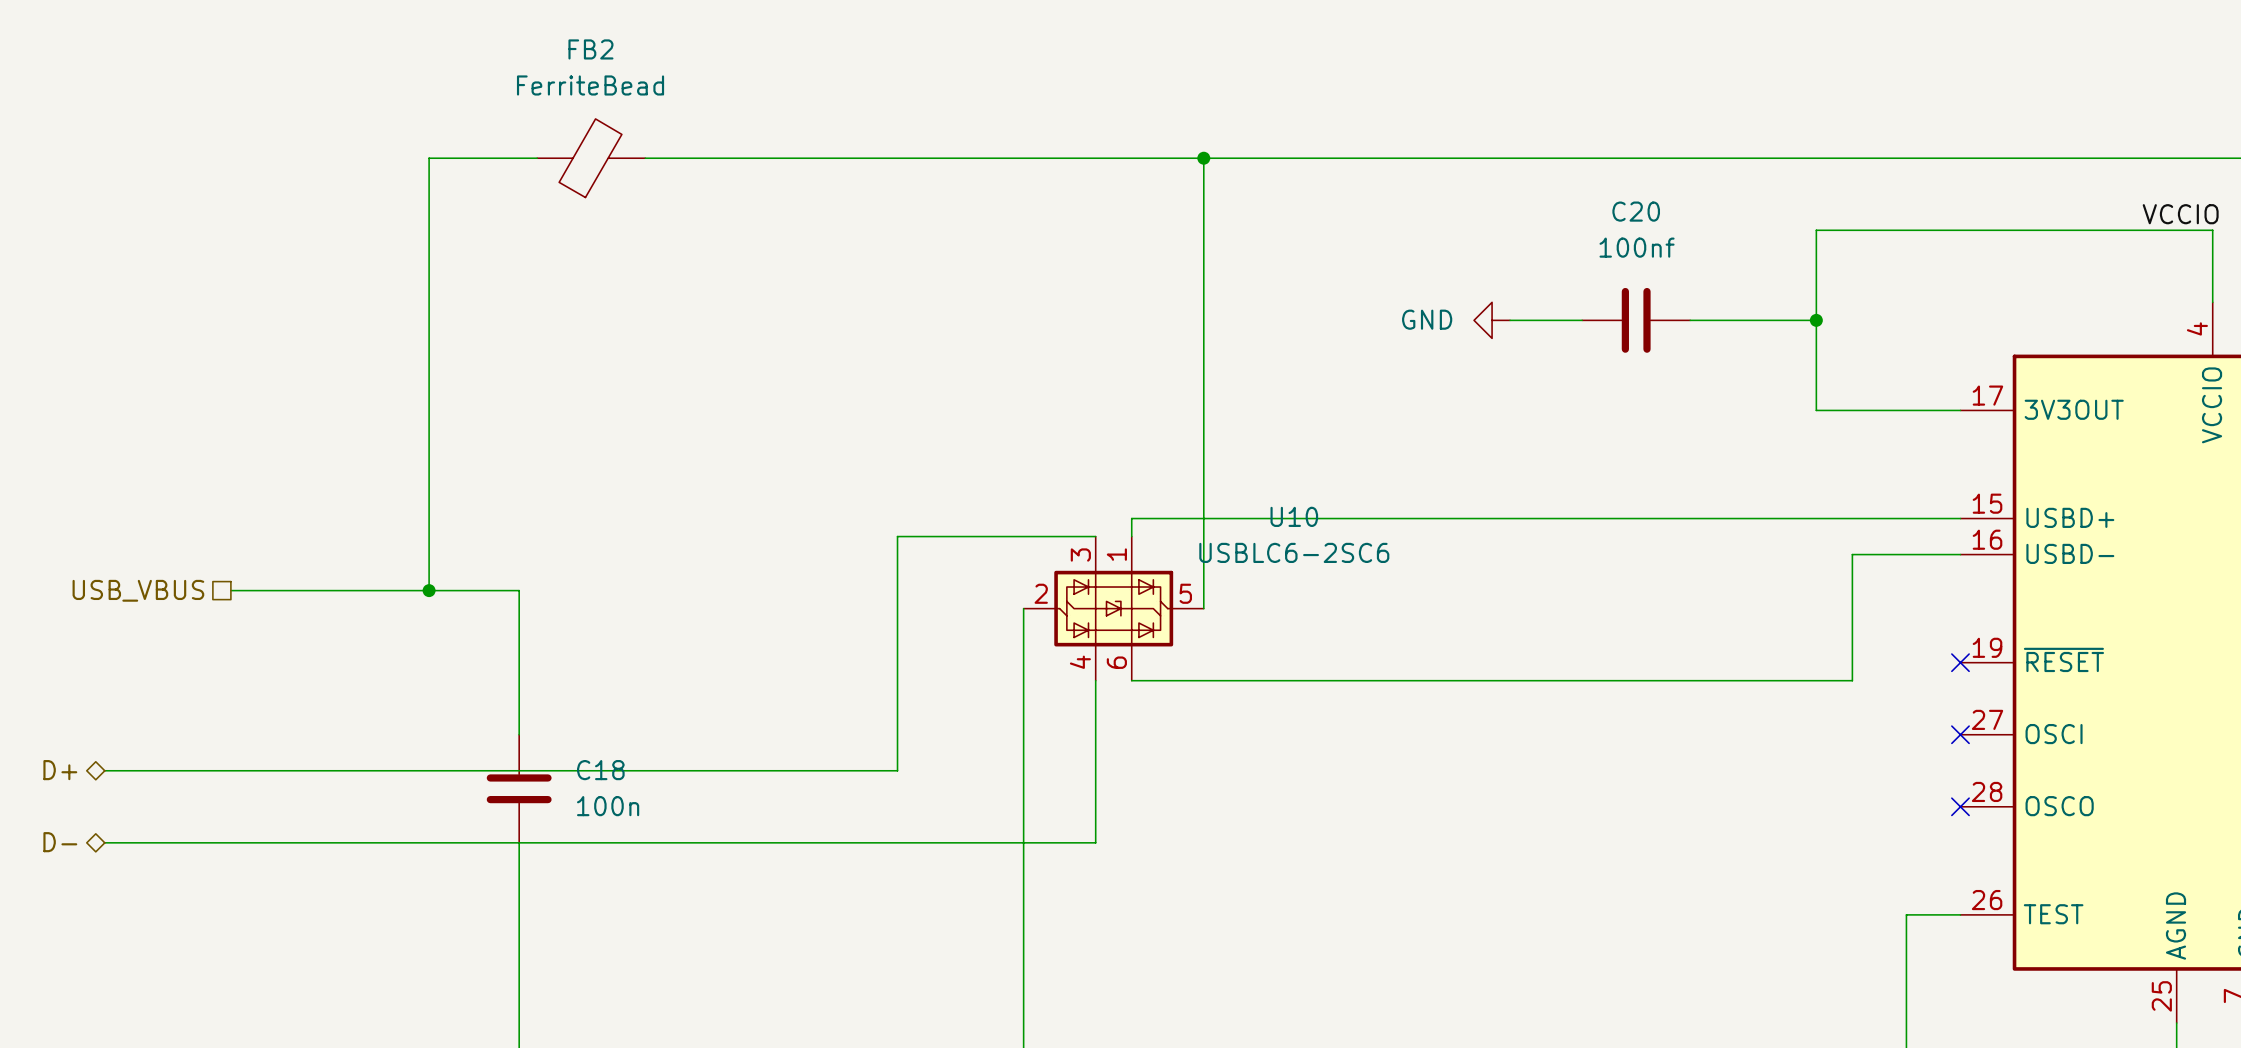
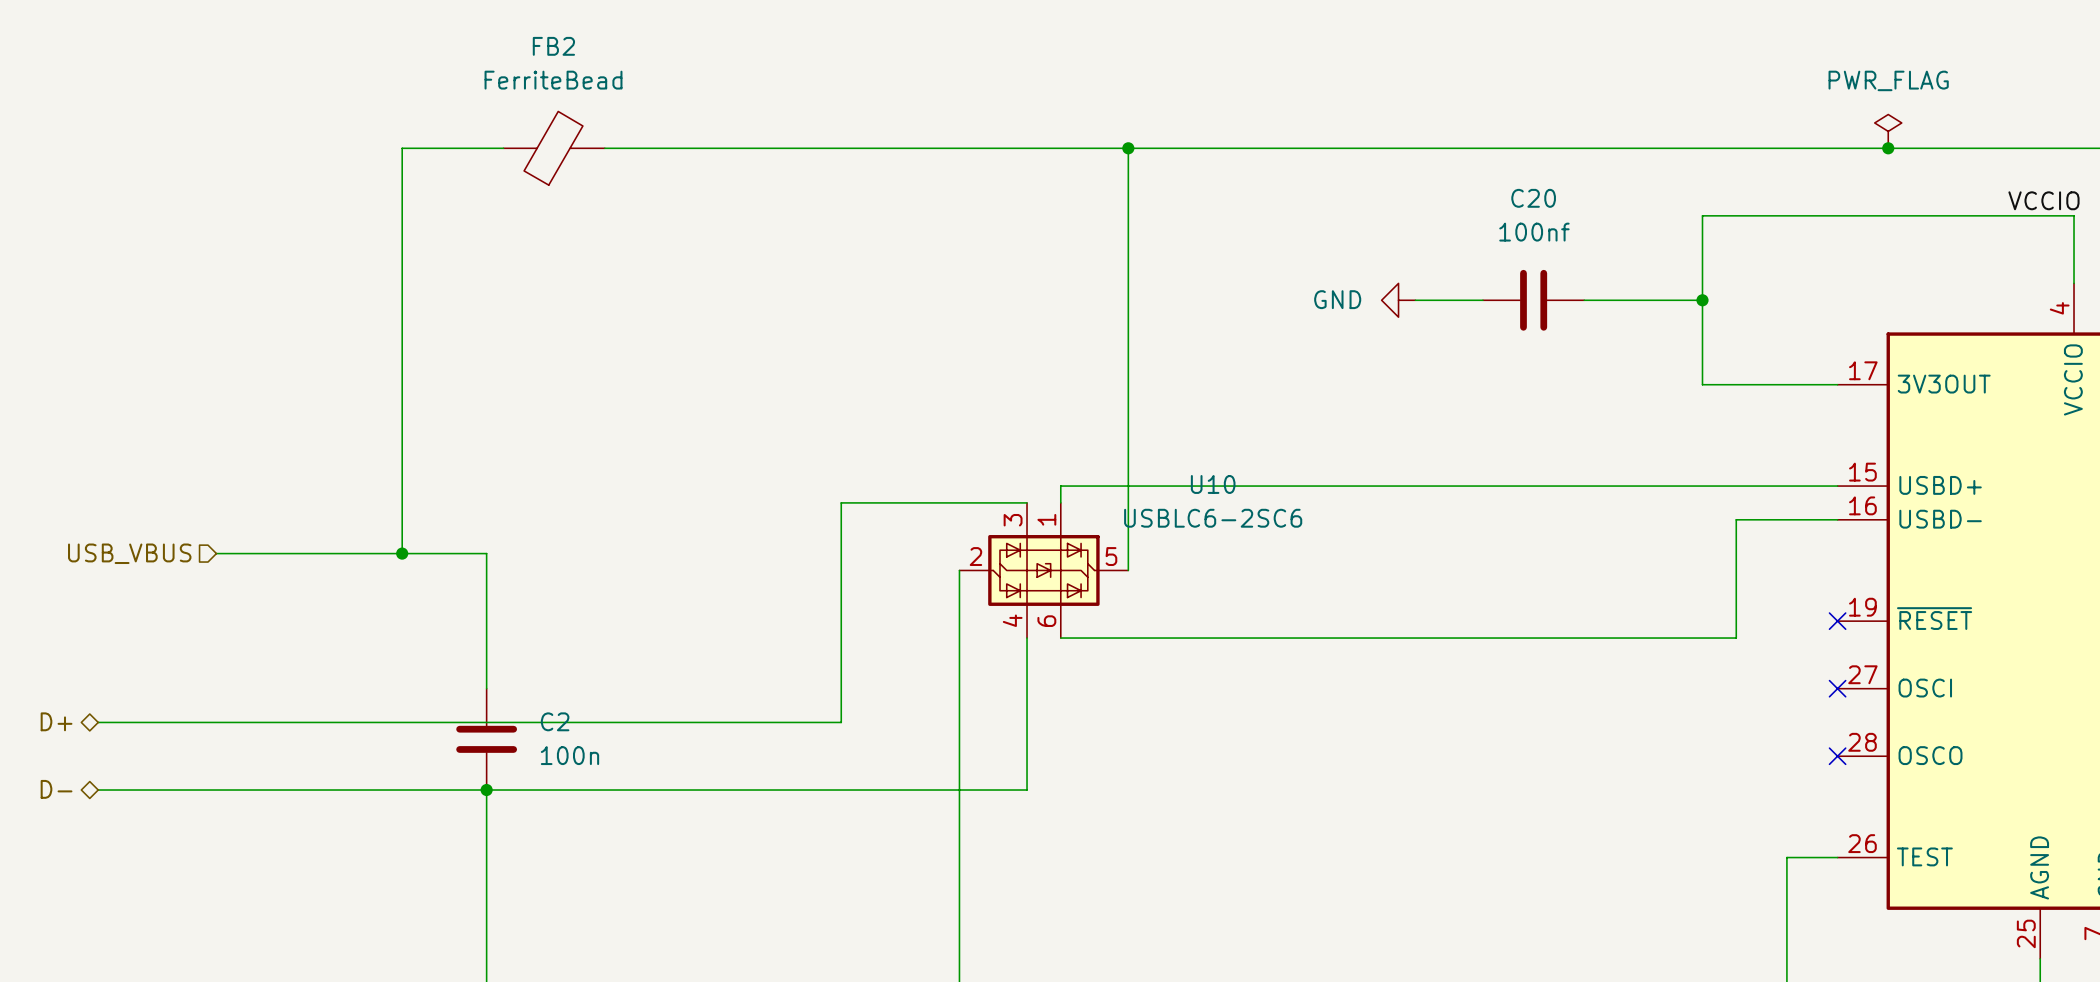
power symbol: none -> PWR_FLAG (1888, 131)
junction: none -> (1888, 148)
hierarchical label shape: passive (138, 590) -> input (129, 553)
C18 name: C18 (600, 770) -> C2 (555, 721)
junction: none -> (486, 790)

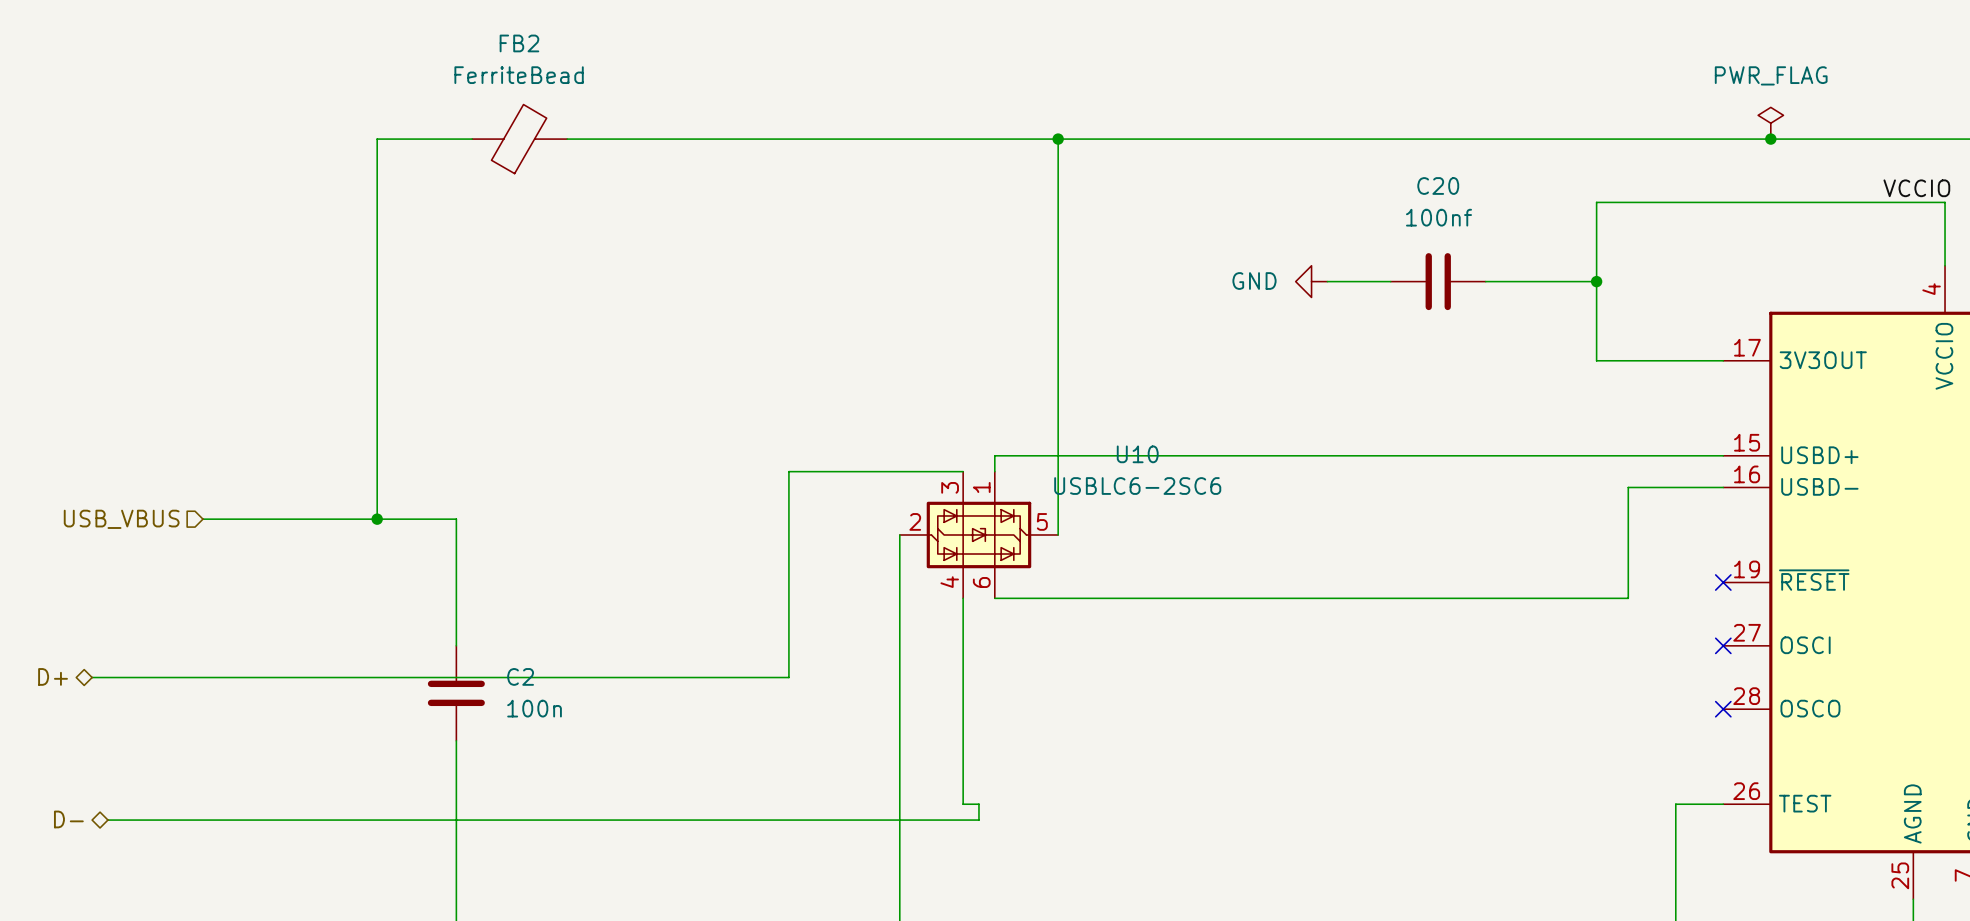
hierarchical label position: D- (56, 789) -> D- (68, 819)
wire: (98, 790) (1027, 790) -> (107, 820) (978, 820) (978, 804) (963, 804) (963, 740)
junction: (486, 790) -> none

